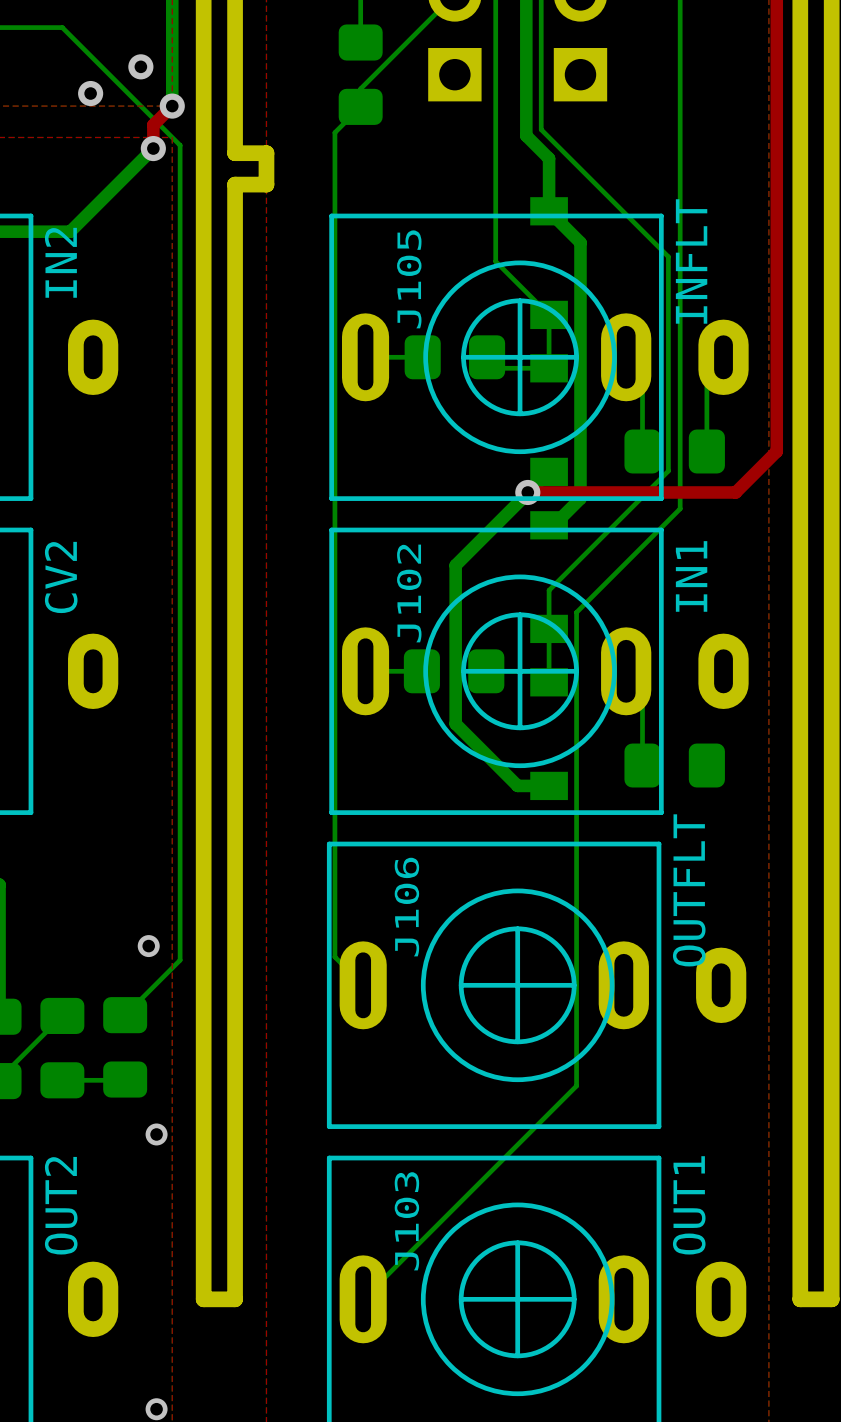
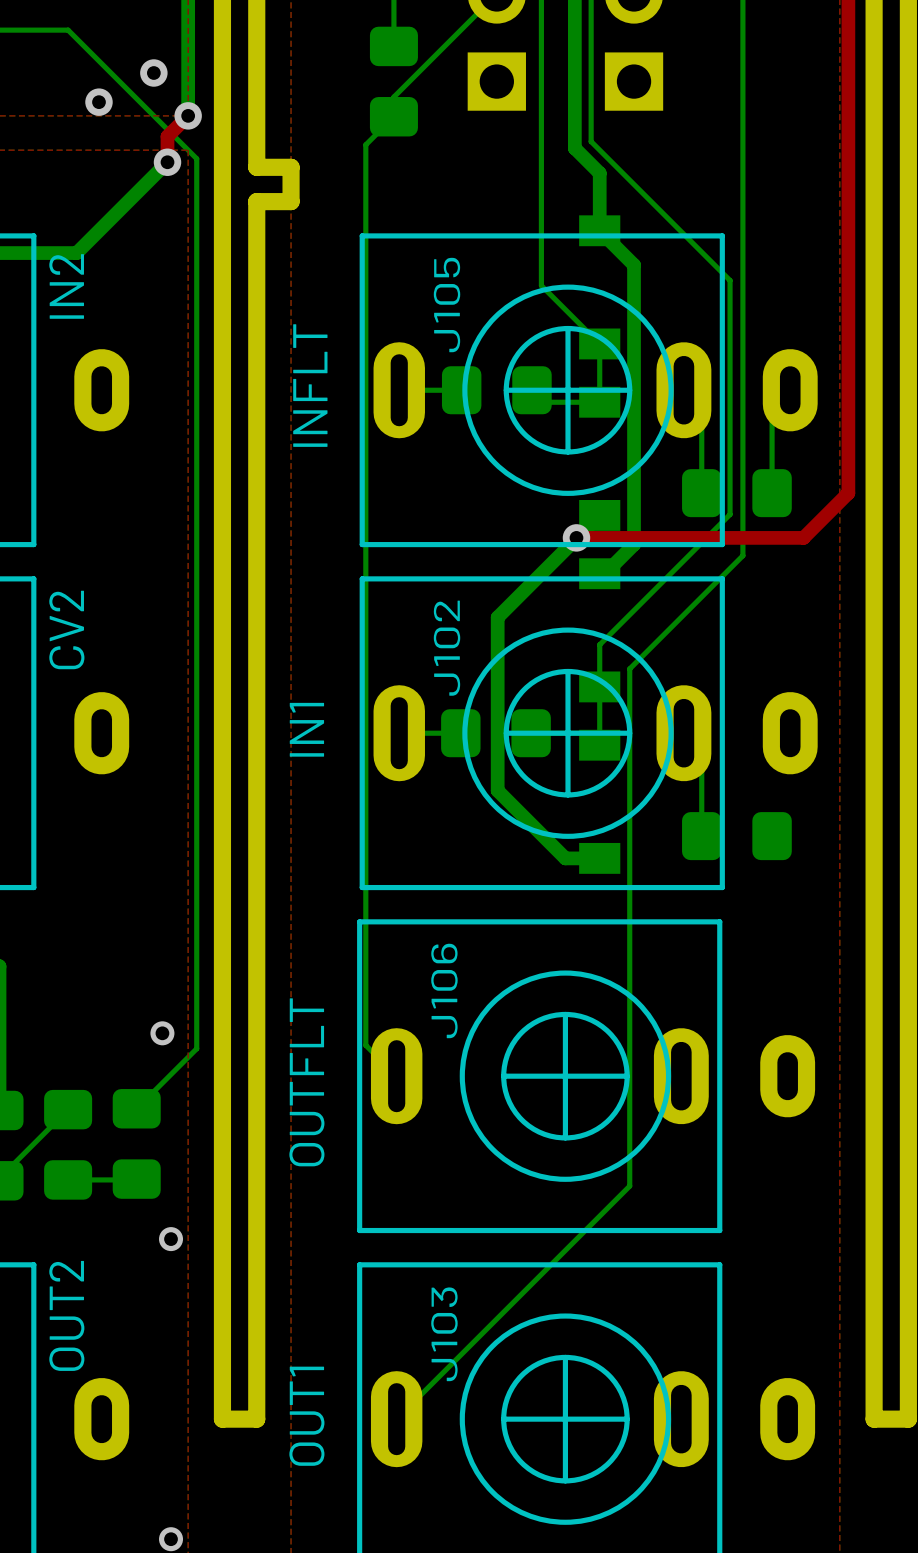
J105 value position: INFLT (691, 261) -> INFLT (310, 385)
J102 value position: IN1 (691, 576) -> IN1 (306, 729)
J106 value position: OUTFLT (689, 890) -> OUTFLT (306, 1082)
J103 value position: OUT1 (689, 1205) -> OUT1 (306, 1416)

